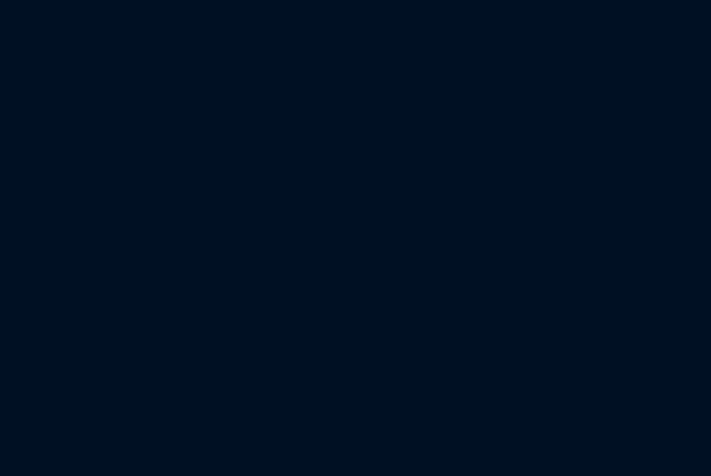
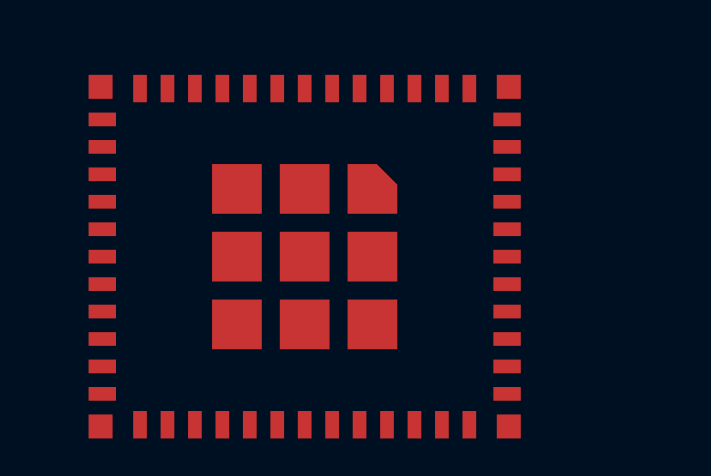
part: none -> (304, 256)

